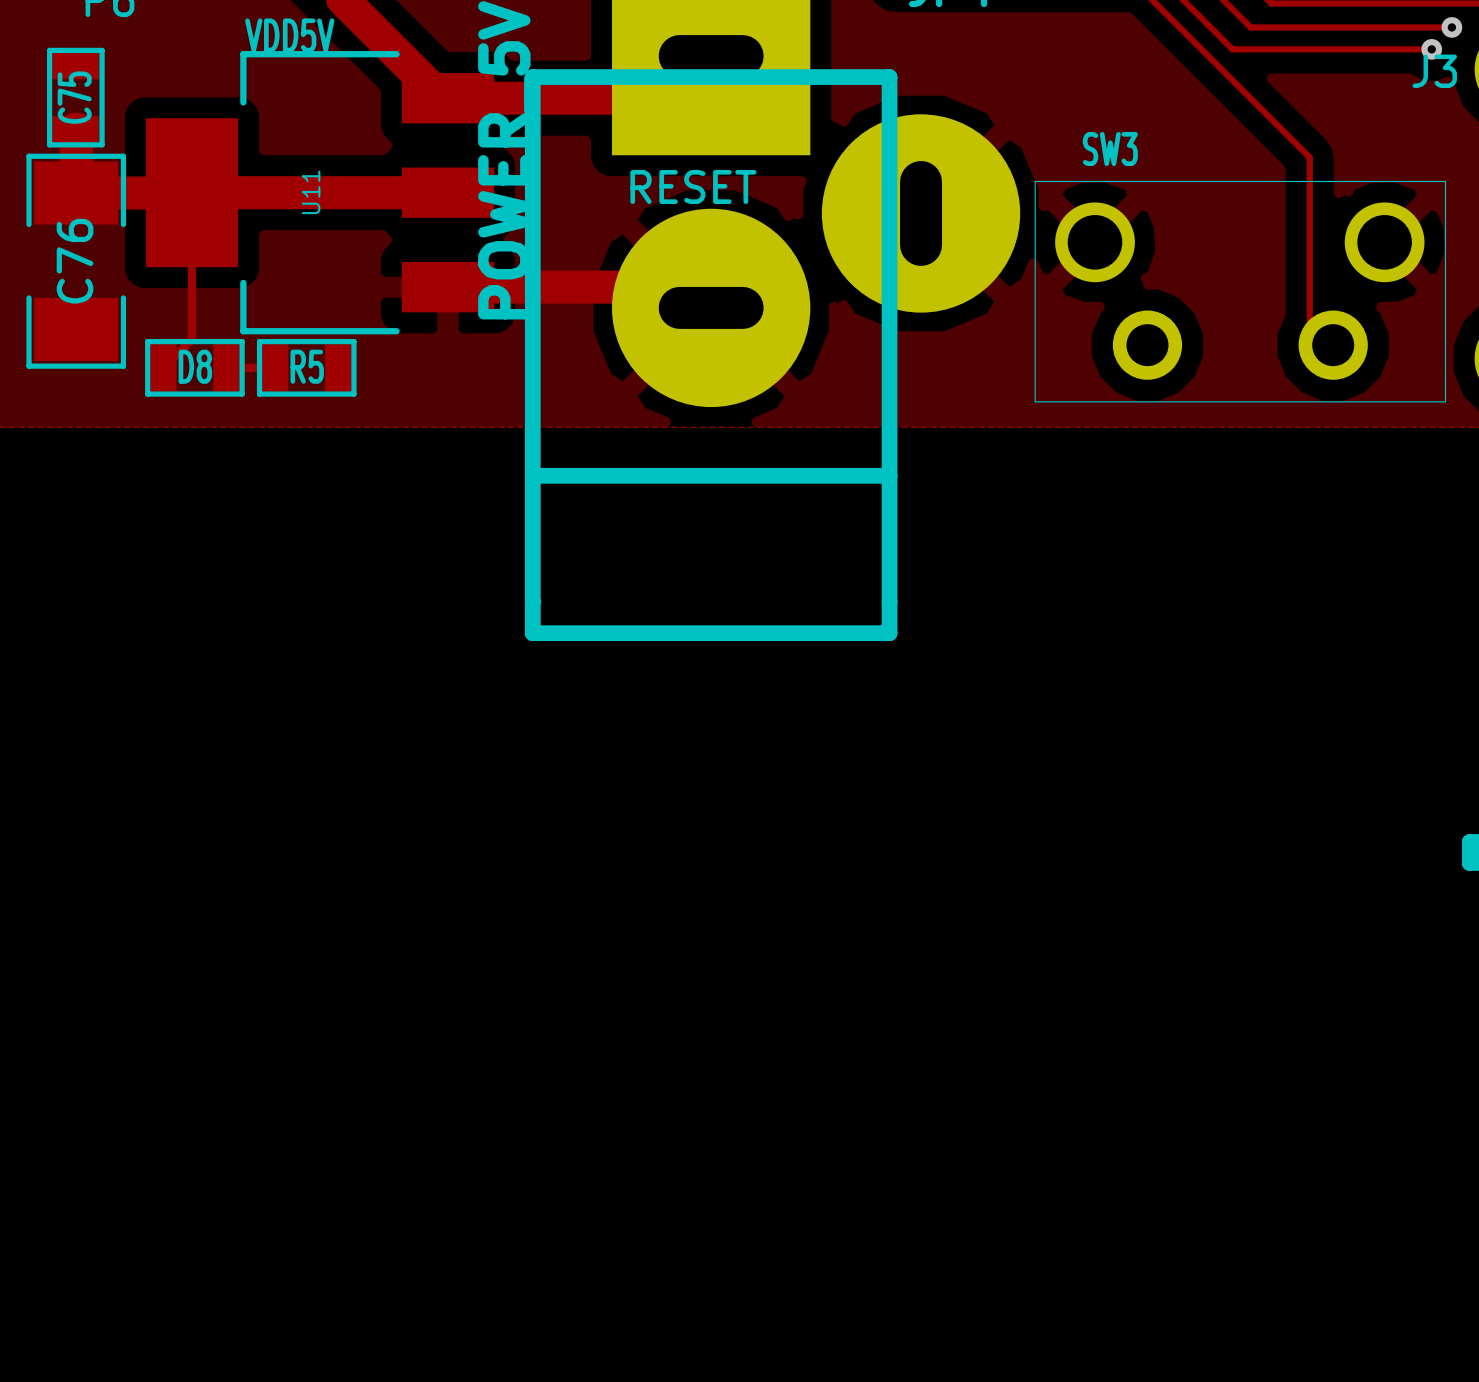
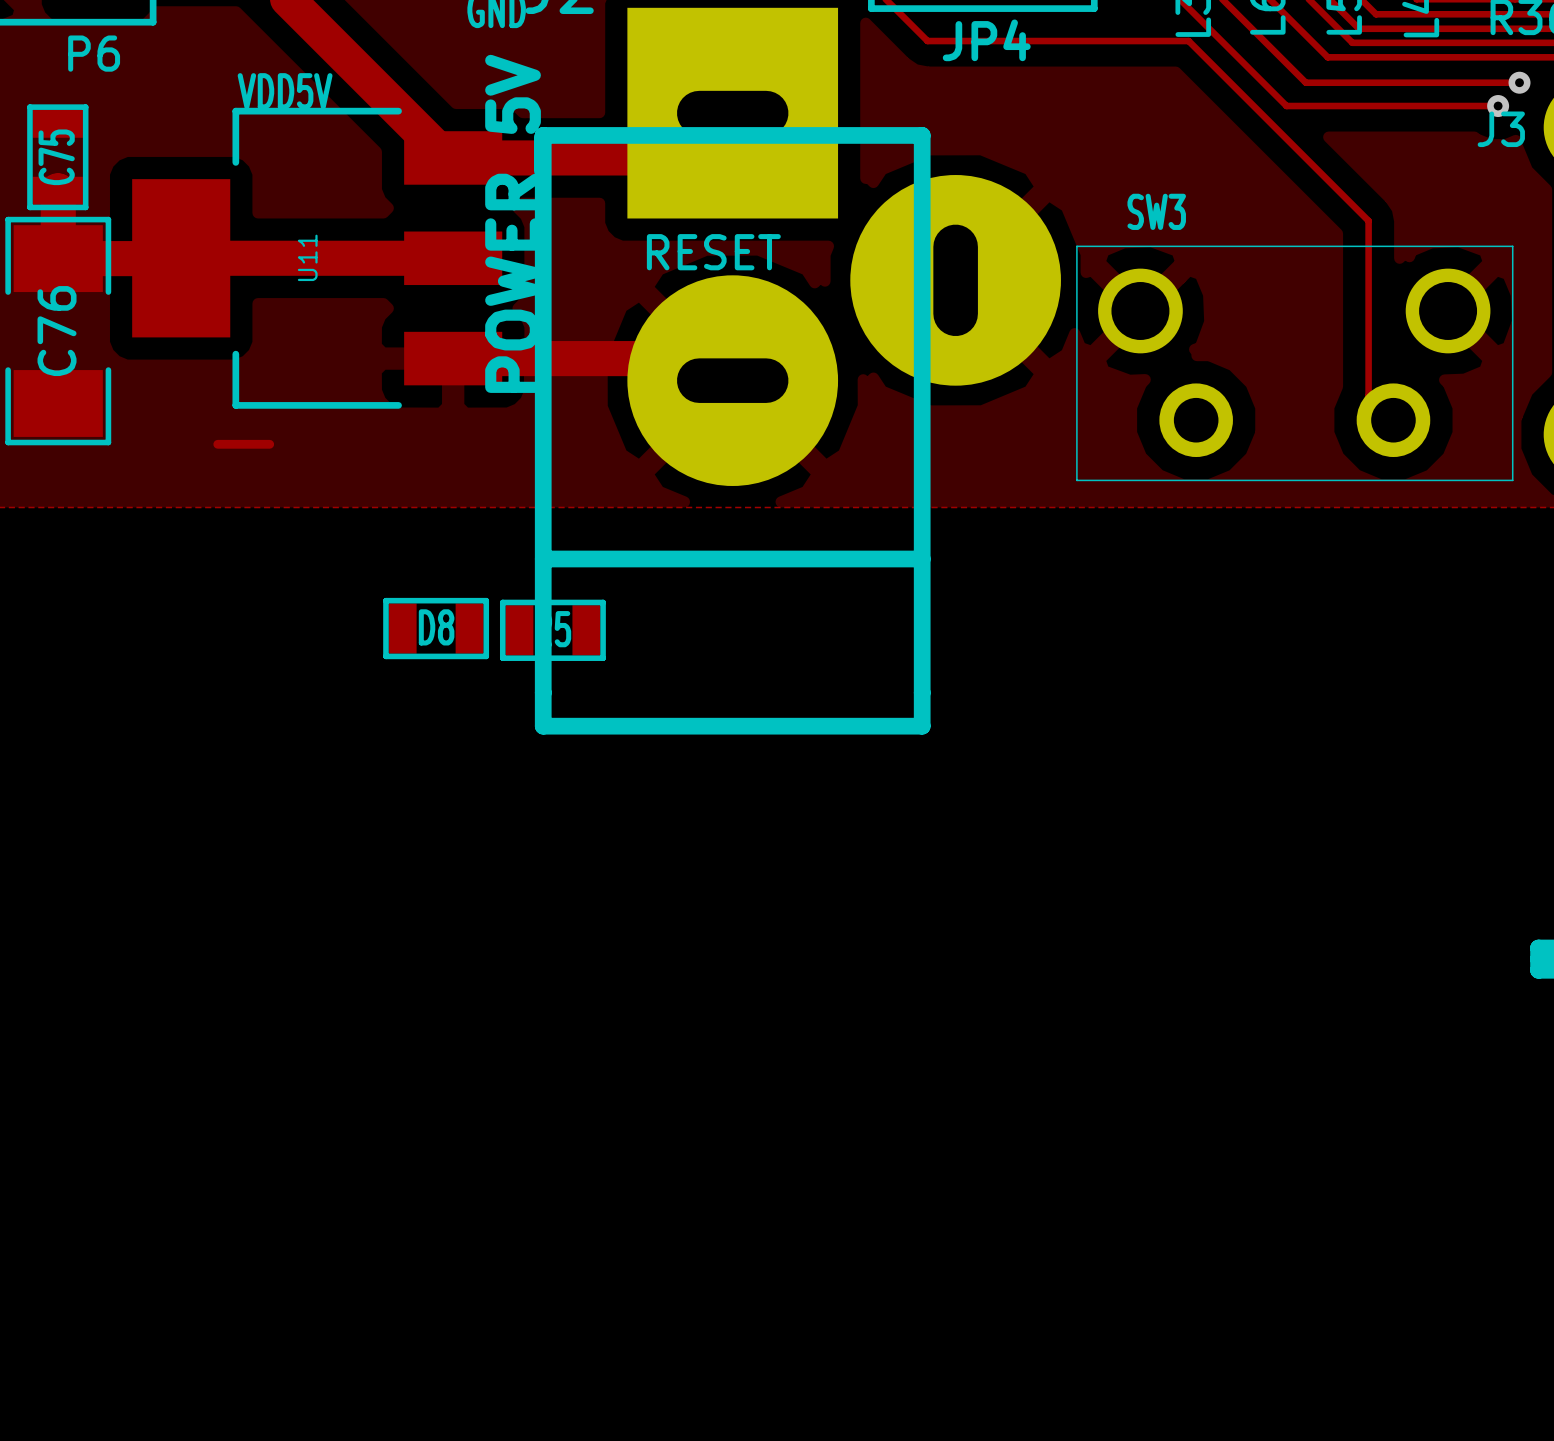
track: (191, 192) (191, 339) (163, 367) -> none
D8 position: (194, 367) -> (436, 628)
R5 position: (306, 367) -> (552, 630)

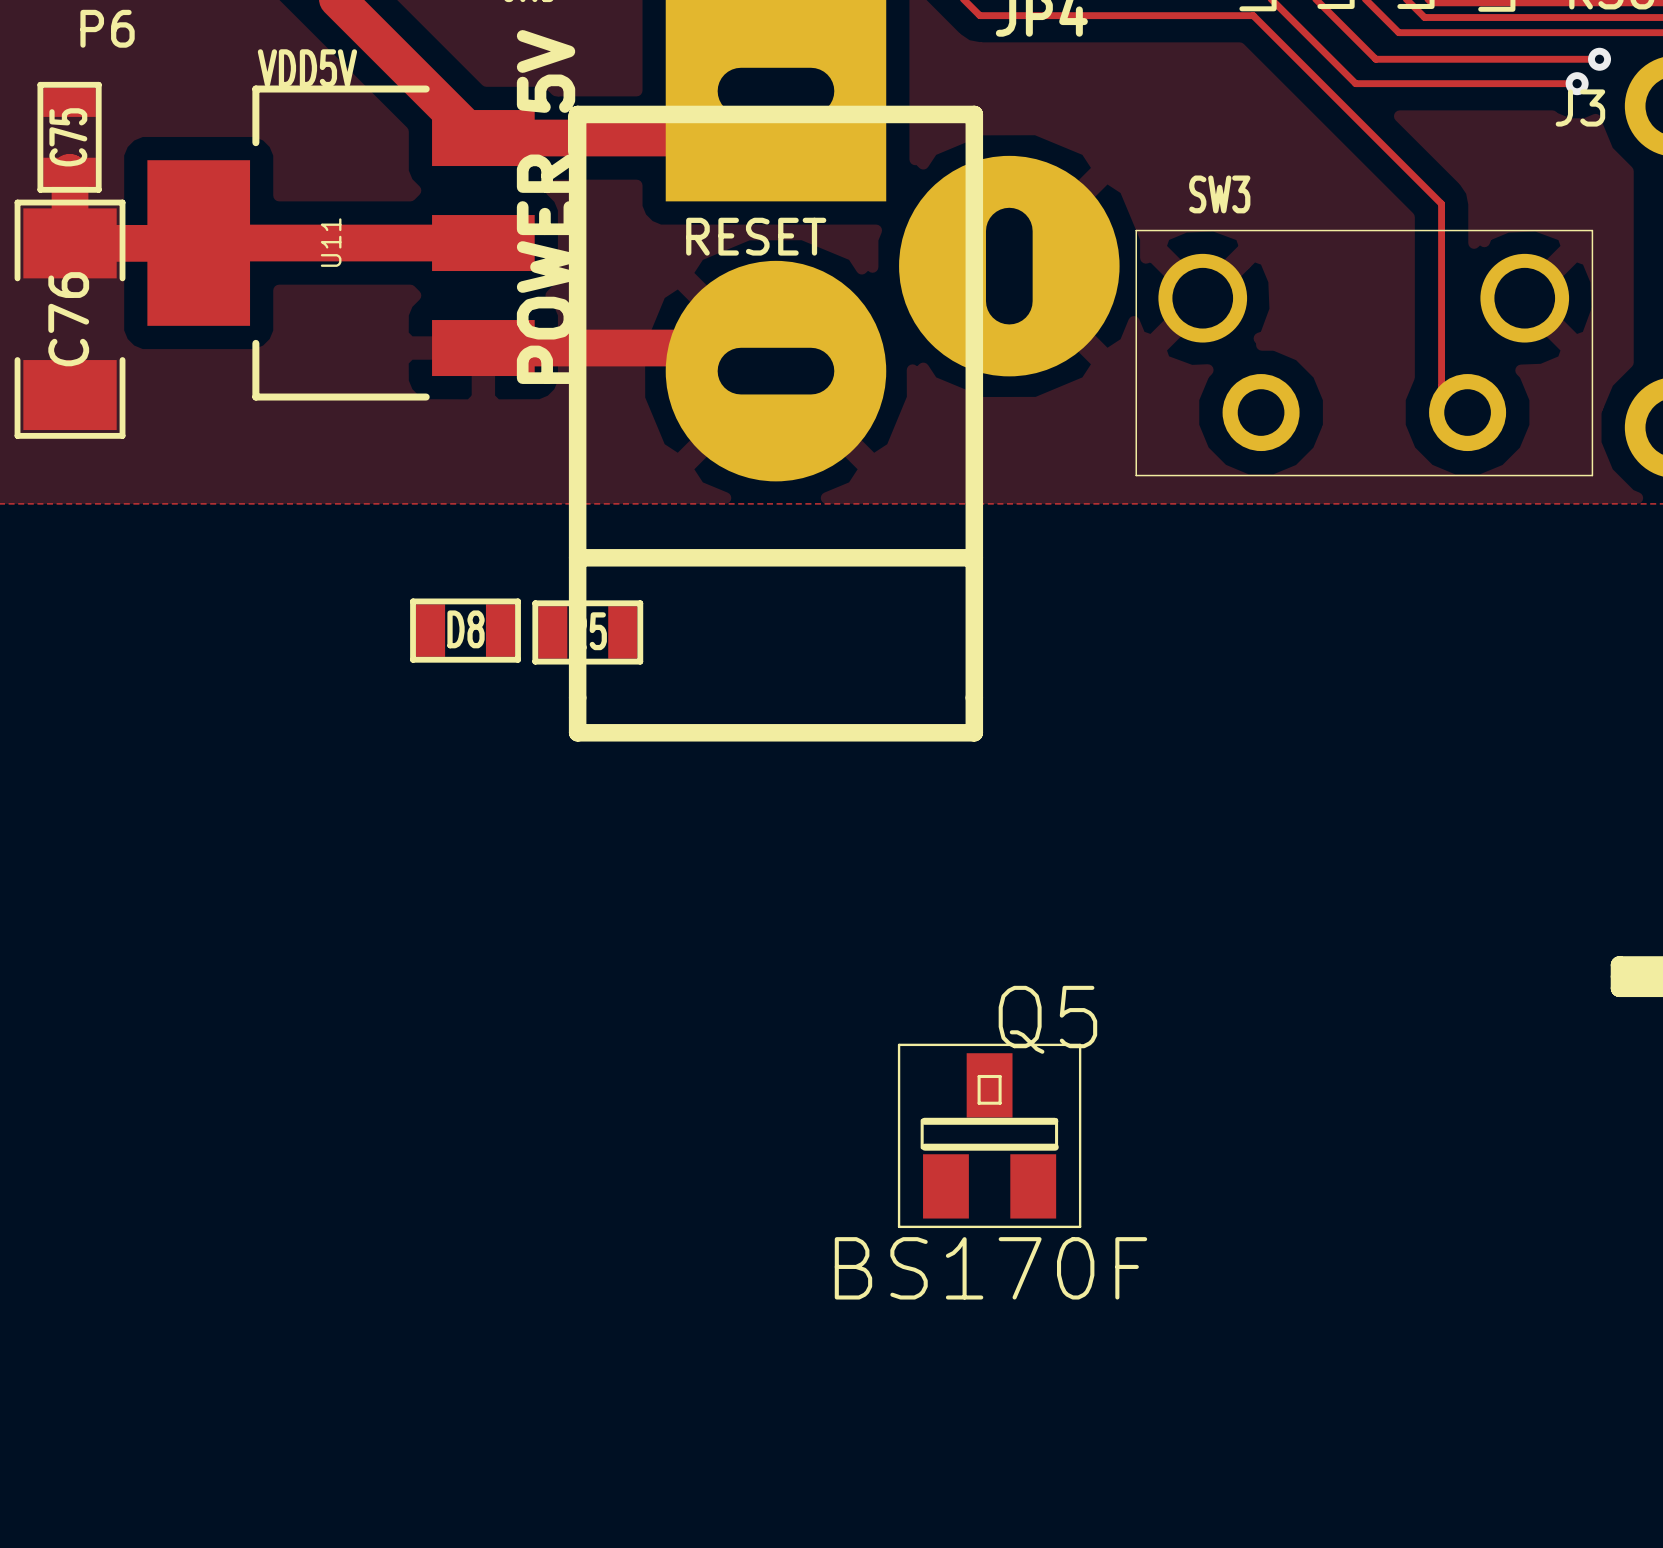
track: (217, 444) (269, 444) -> none
Q5: none -> BS170F (989, 1135)

